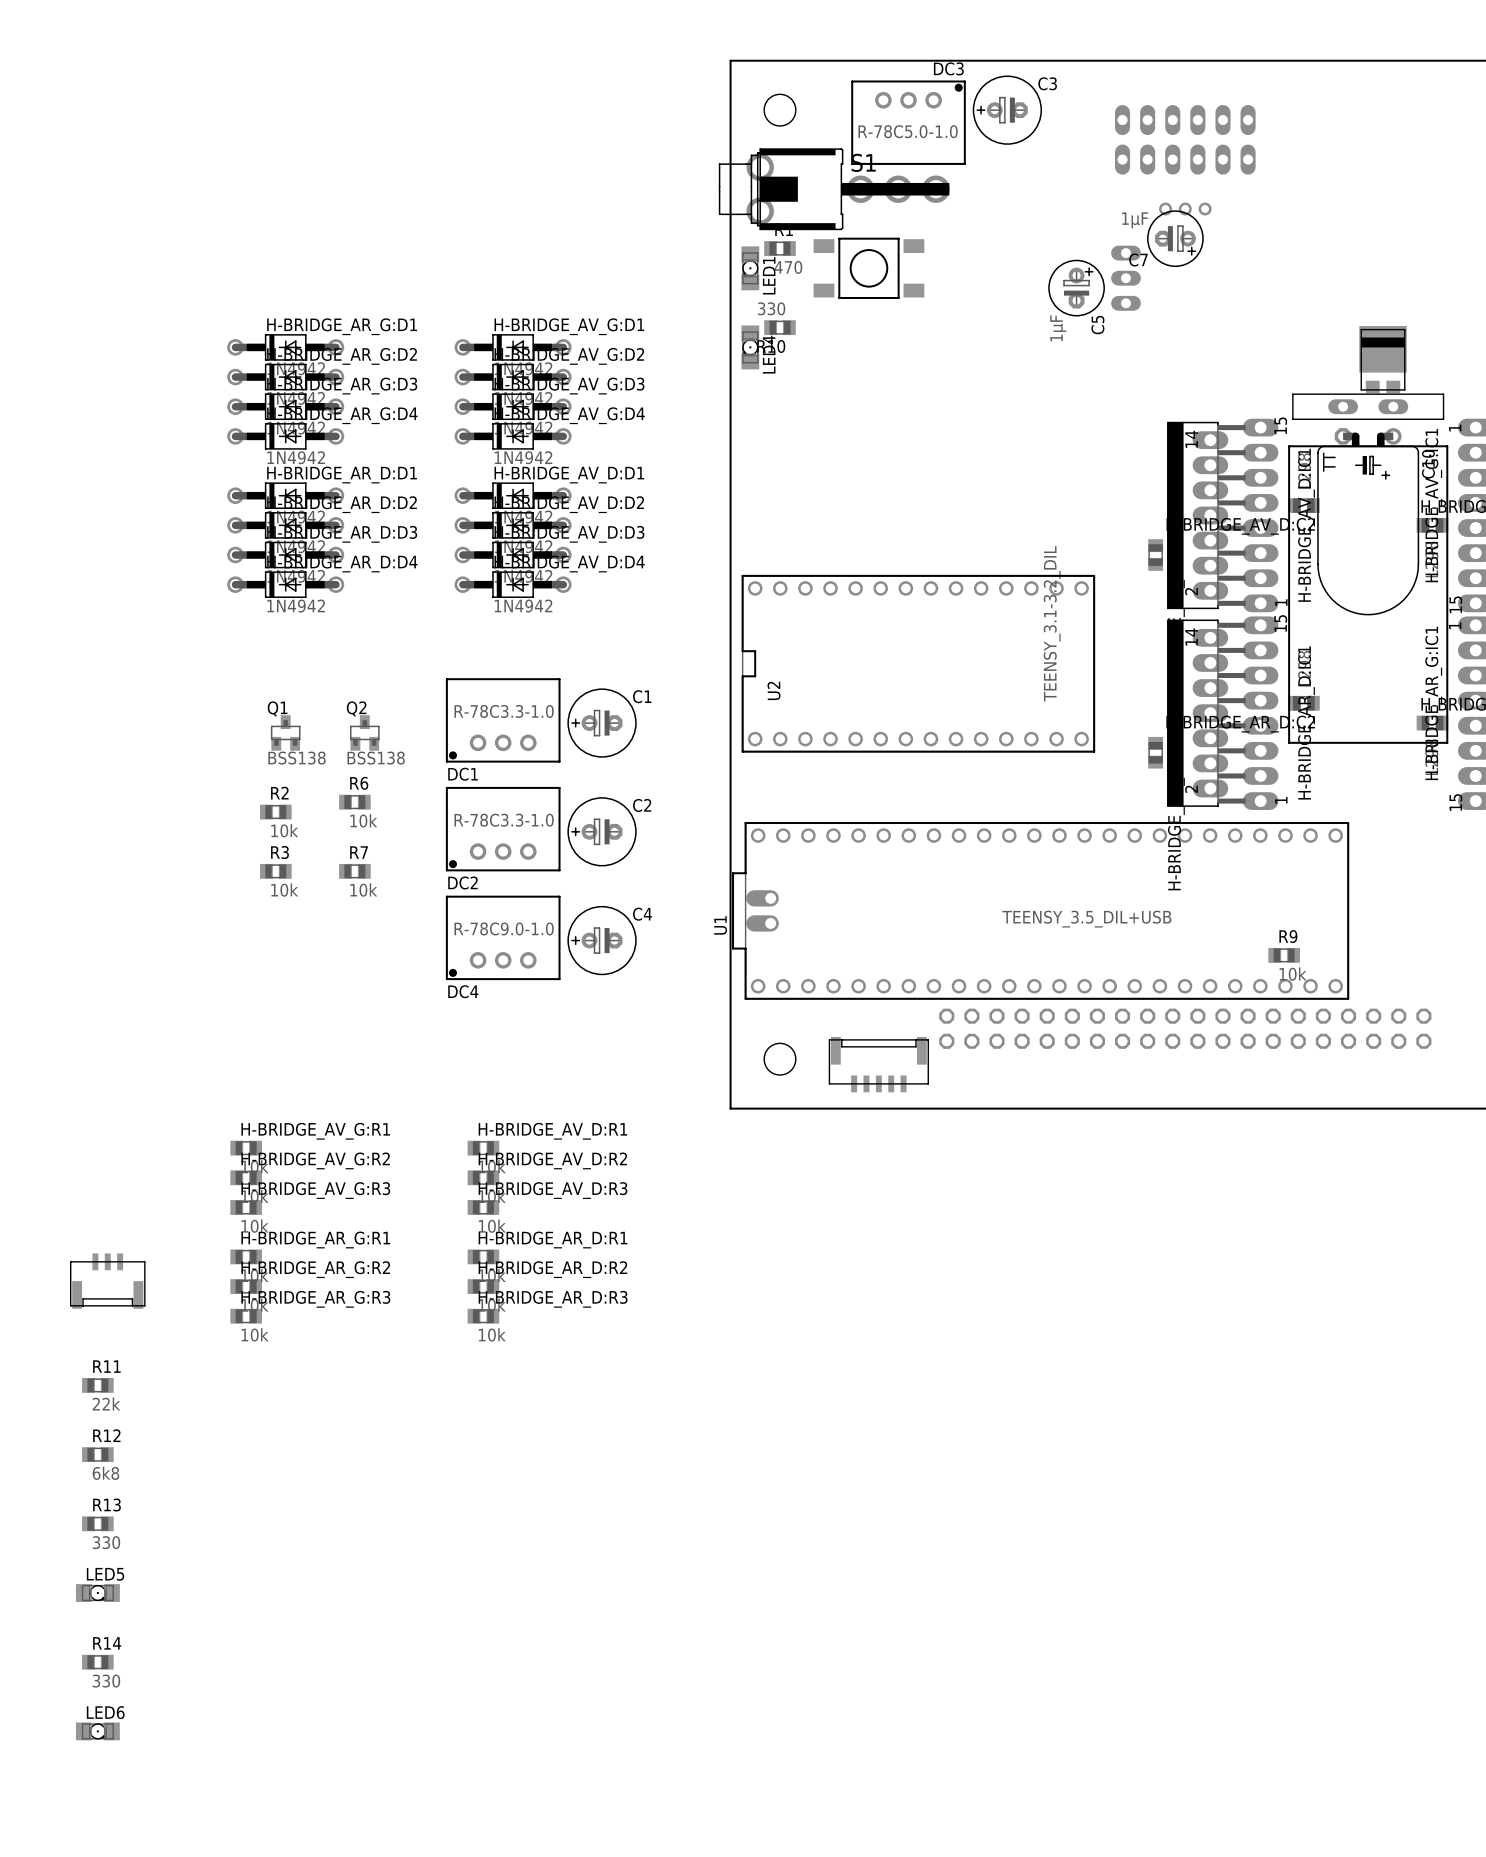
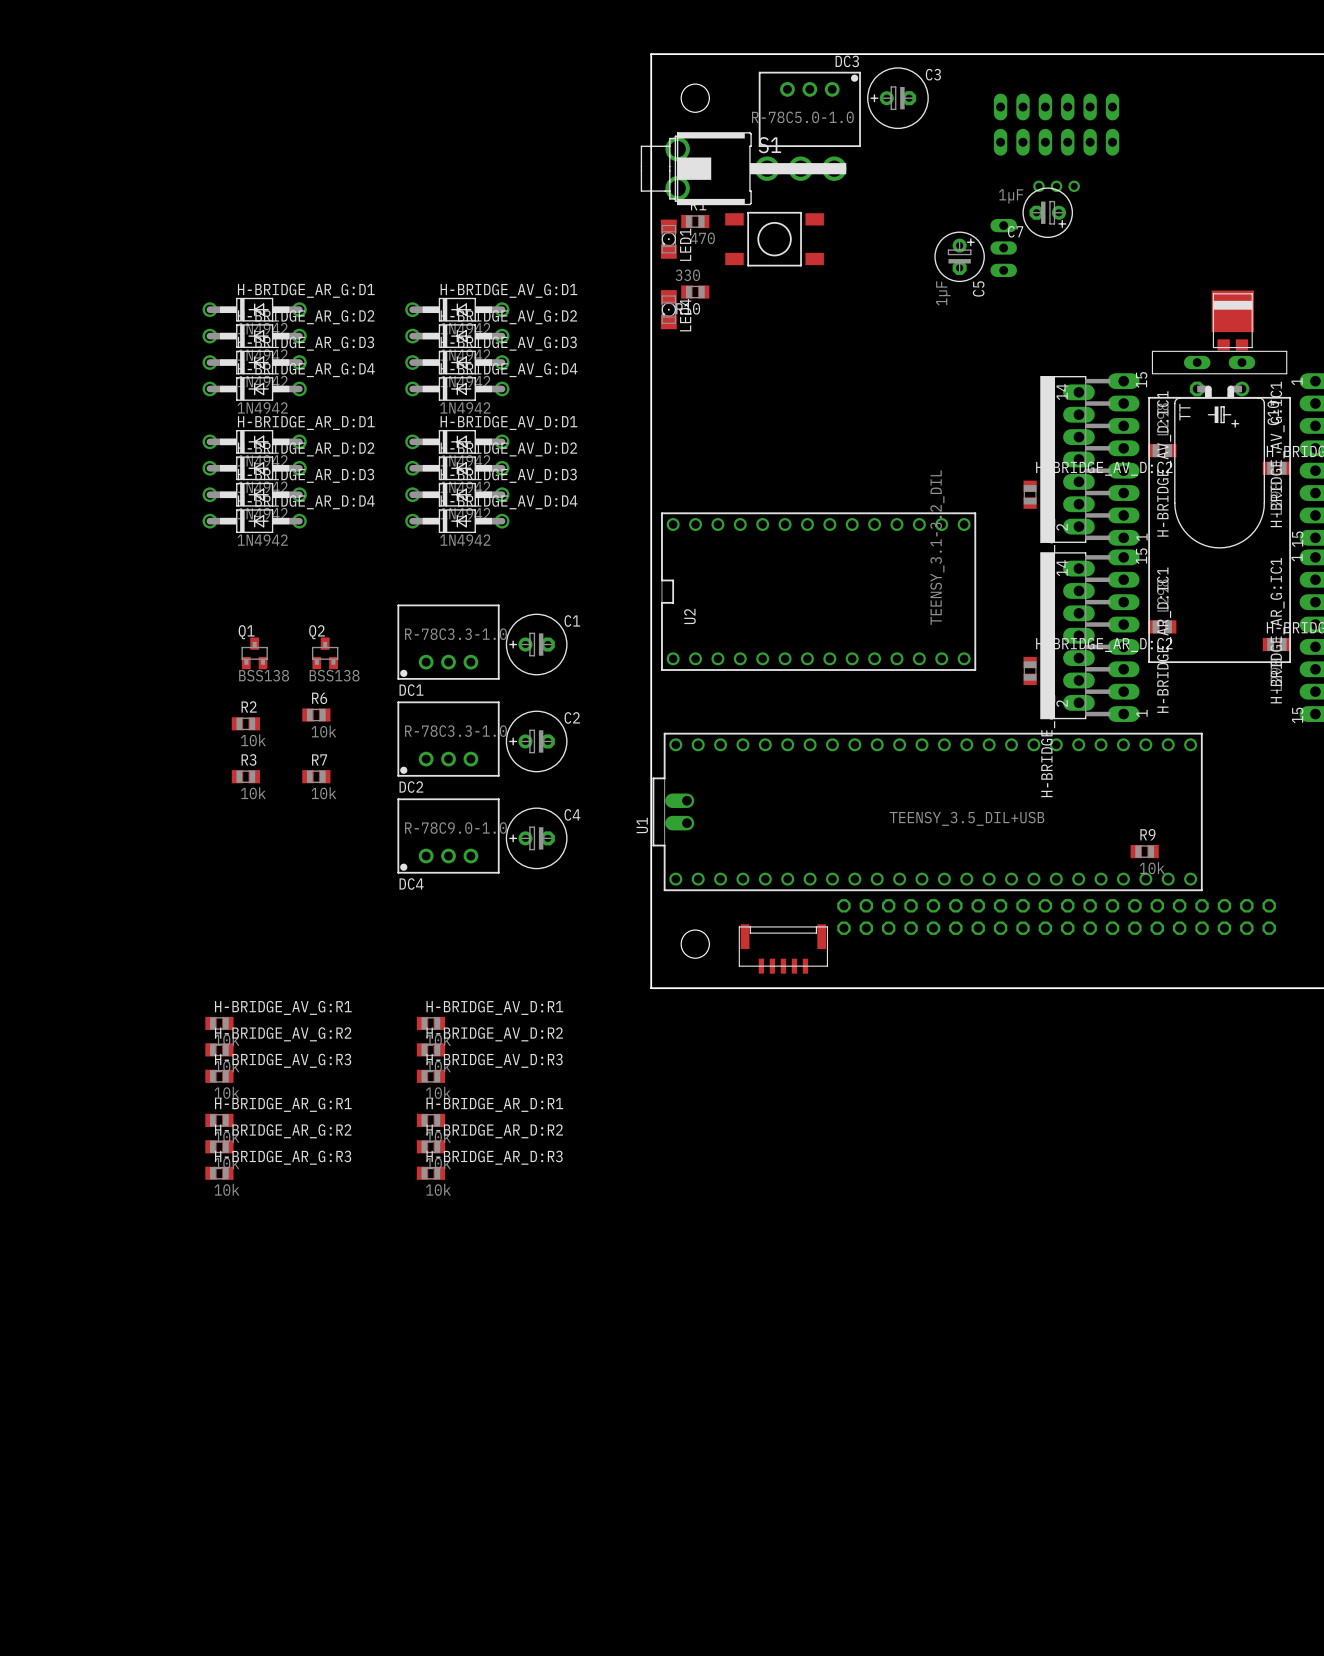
part: (107, 1281) -> none
R11: 22k (97, 1385) -> none
R12: 6k8 (97, 1454) -> none
R13: 330 (97, 1523) -> none
LED5: (97, 1593) -> none
R14: 330 (97, 1662) -> none
LED6: (97, 1731) -> none

